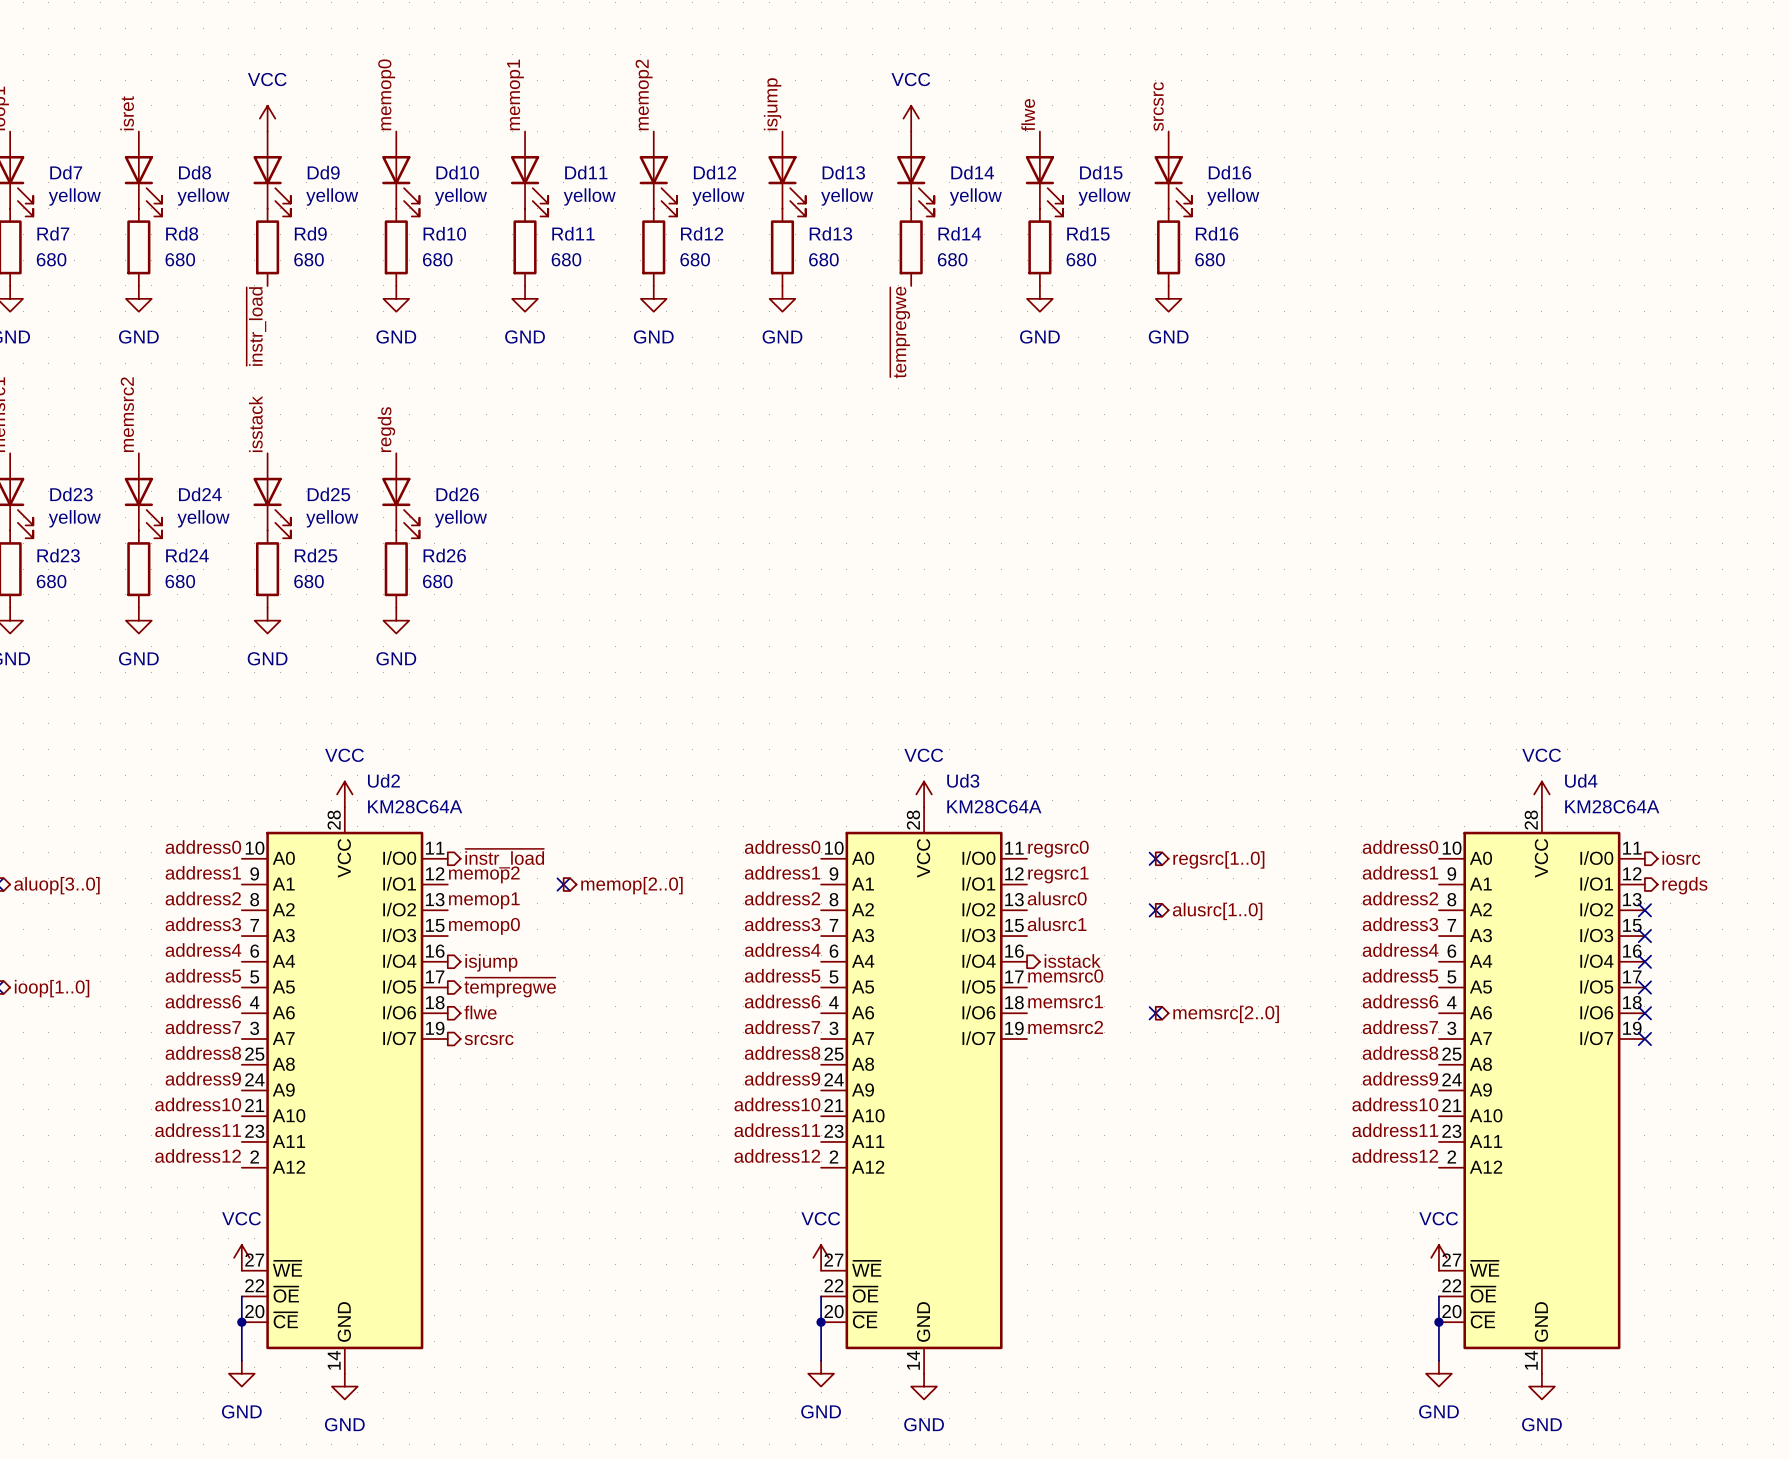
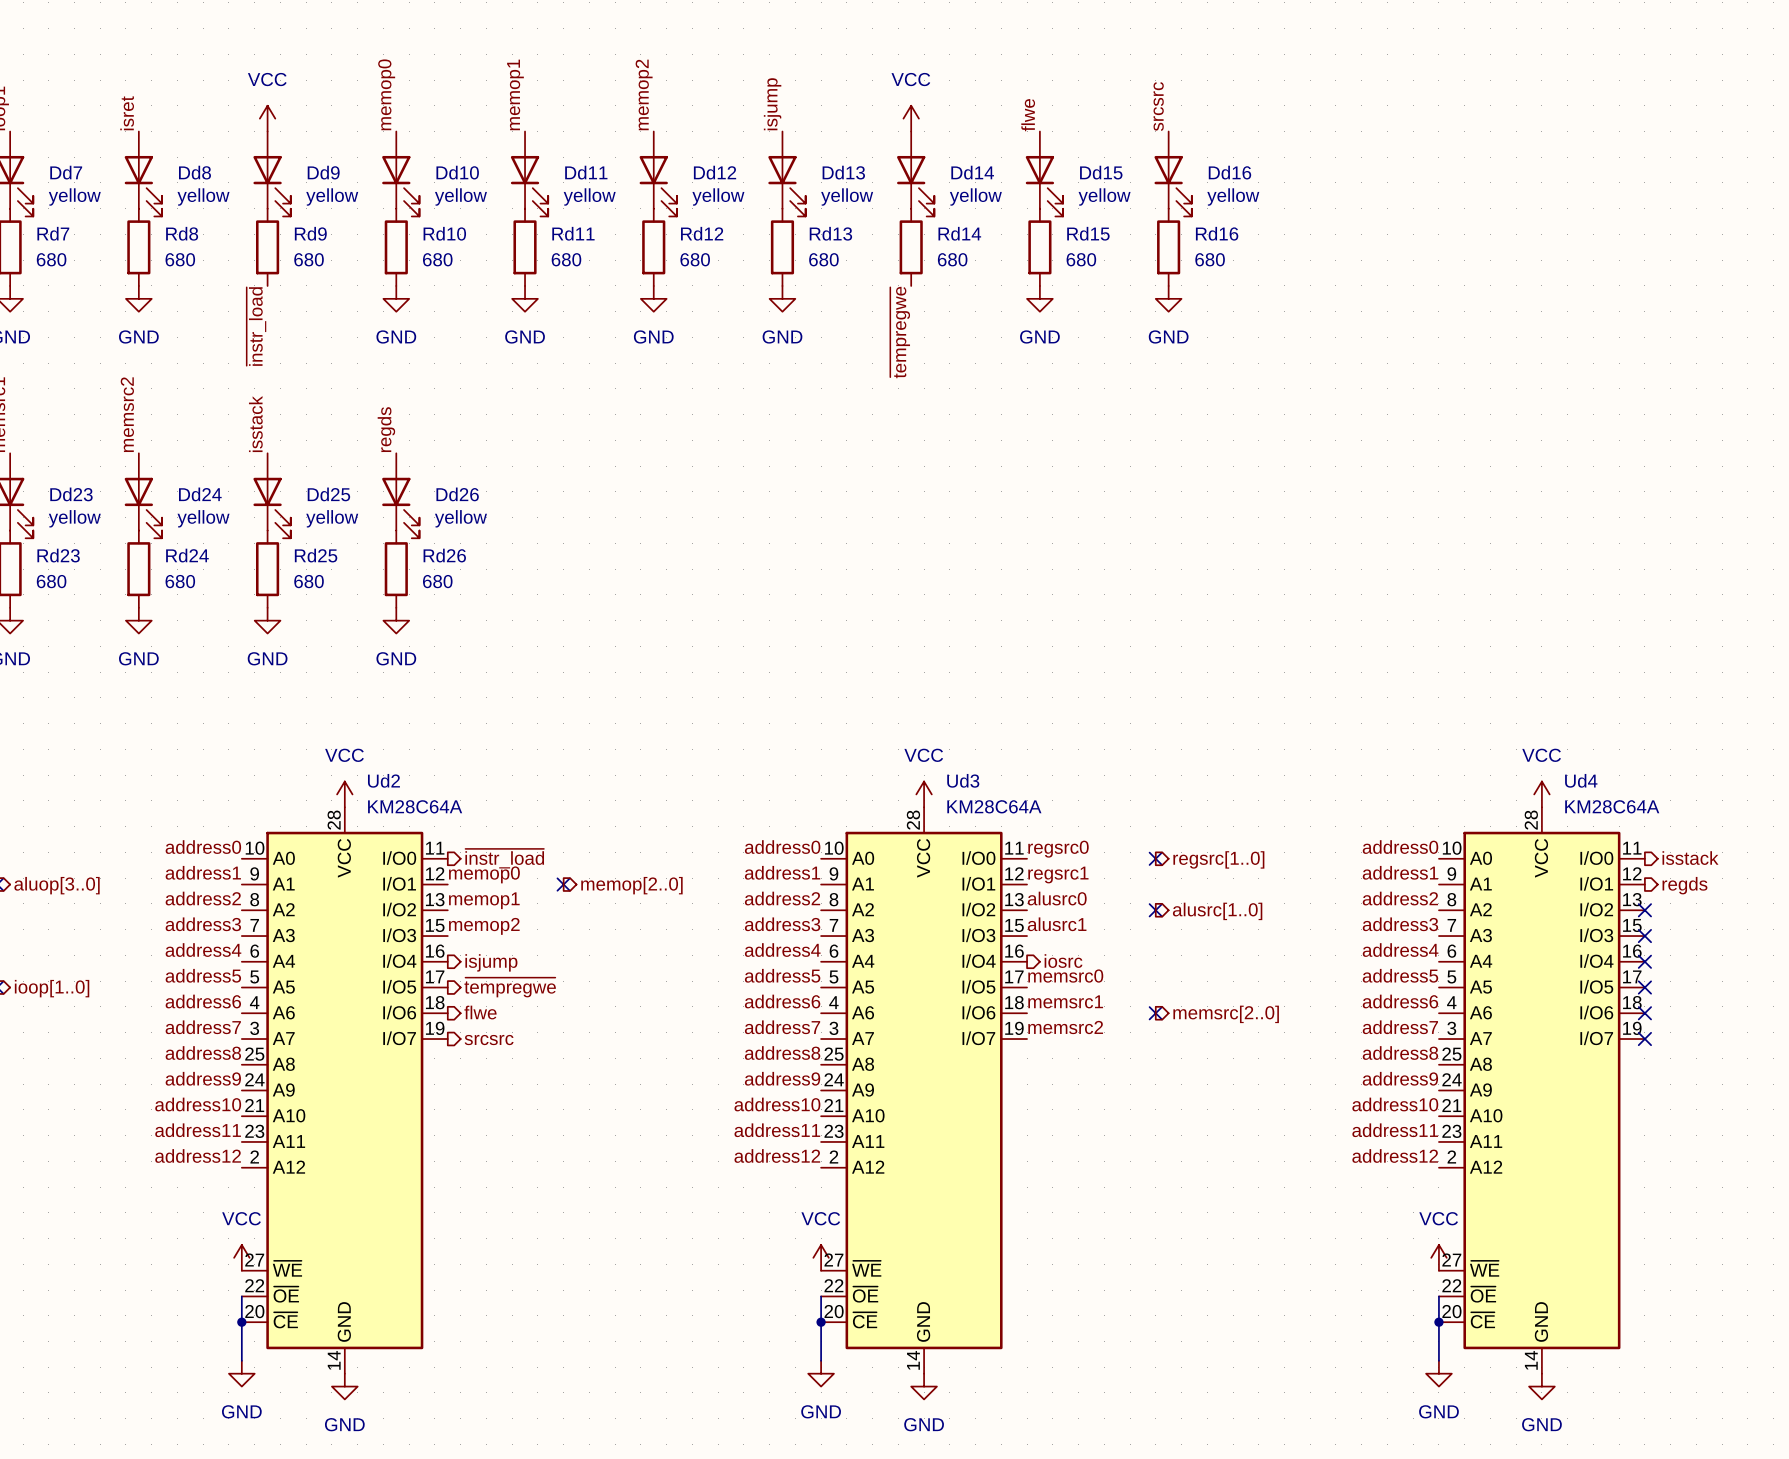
hierarchical label: iosrc (1681, 858) -> isstack (1690, 858)
label: memop2 (484, 874) -> memop0 (484, 874)
label: memop0 (484, 926) -> memop2 (484, 926)
hierarchical label: isstack (1072, 961) -> iosrc (1063, 961)

